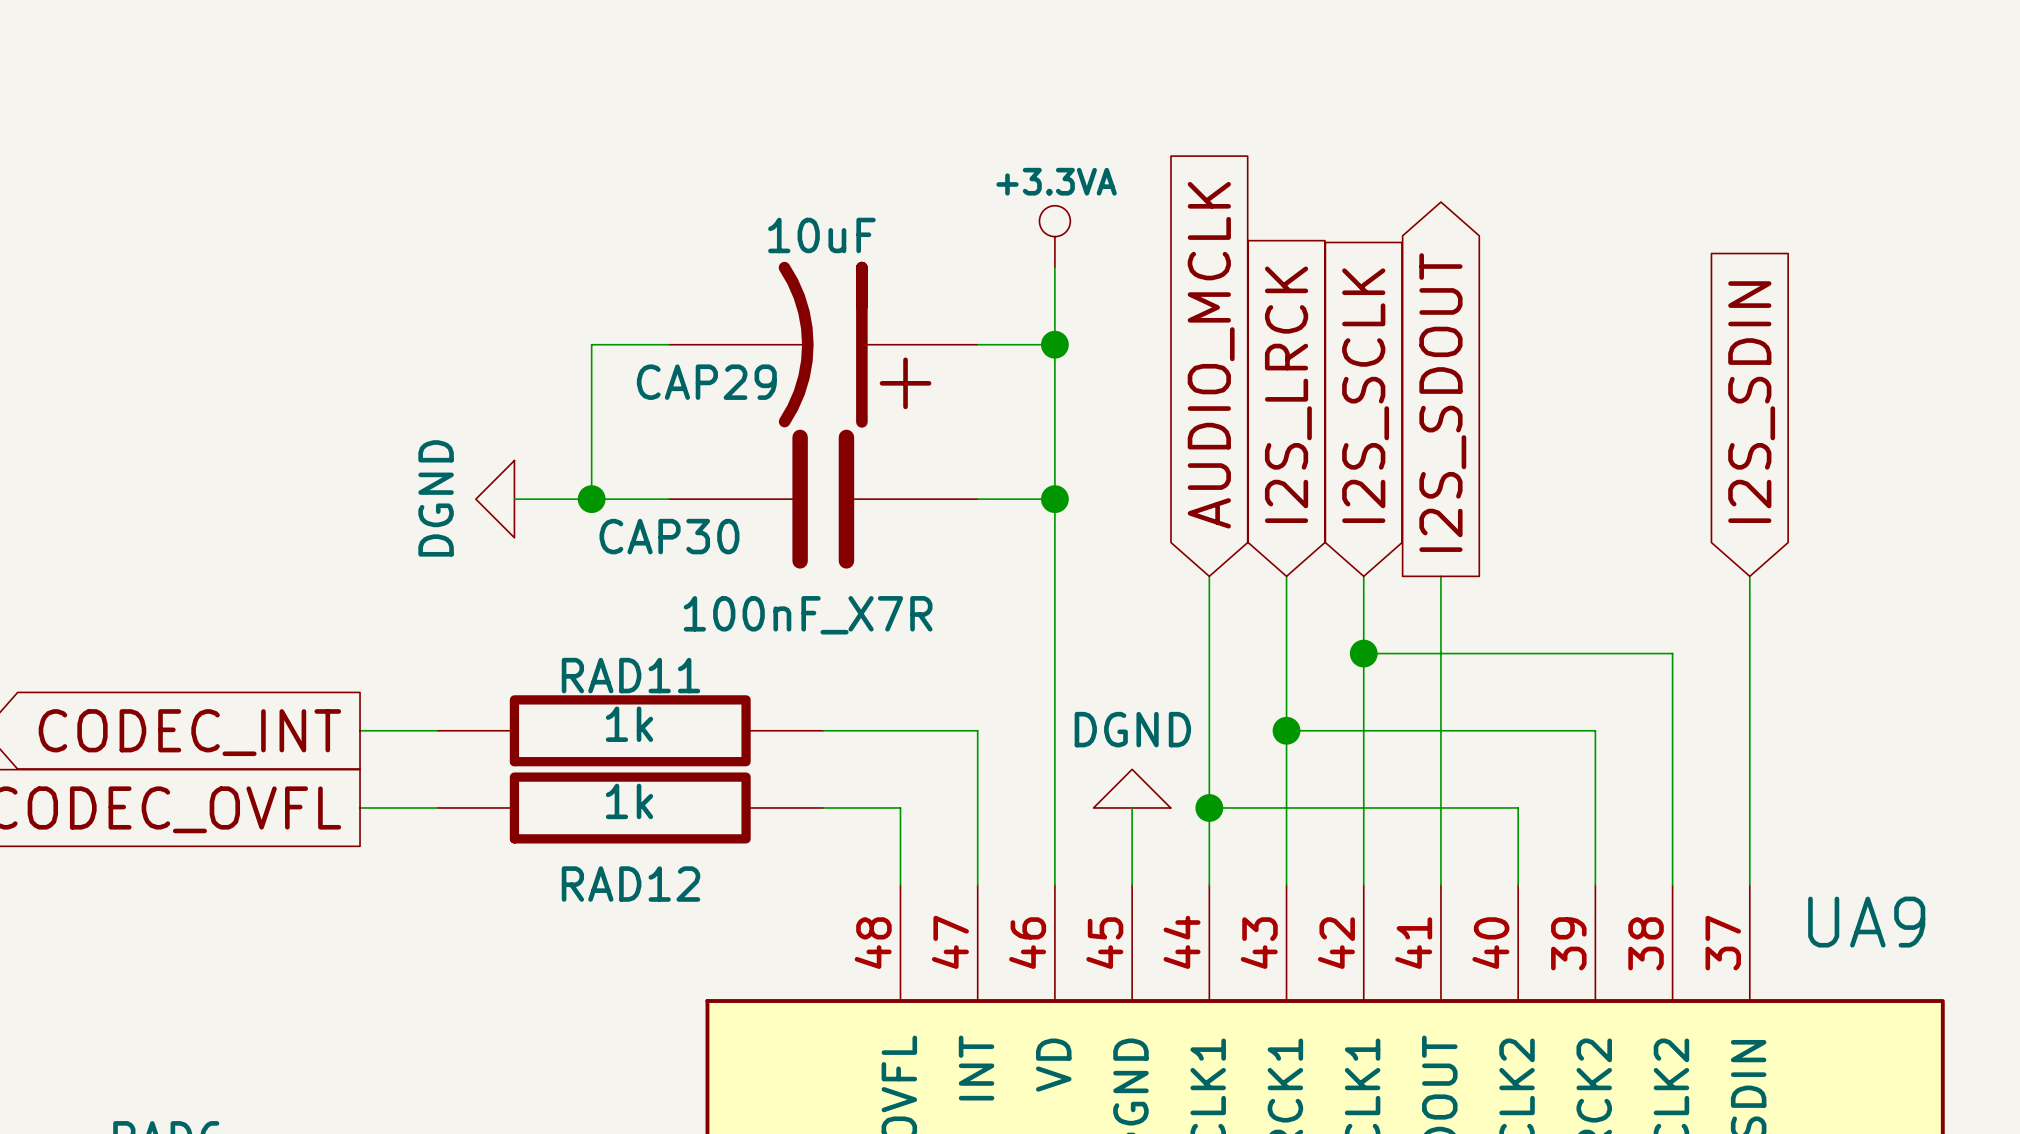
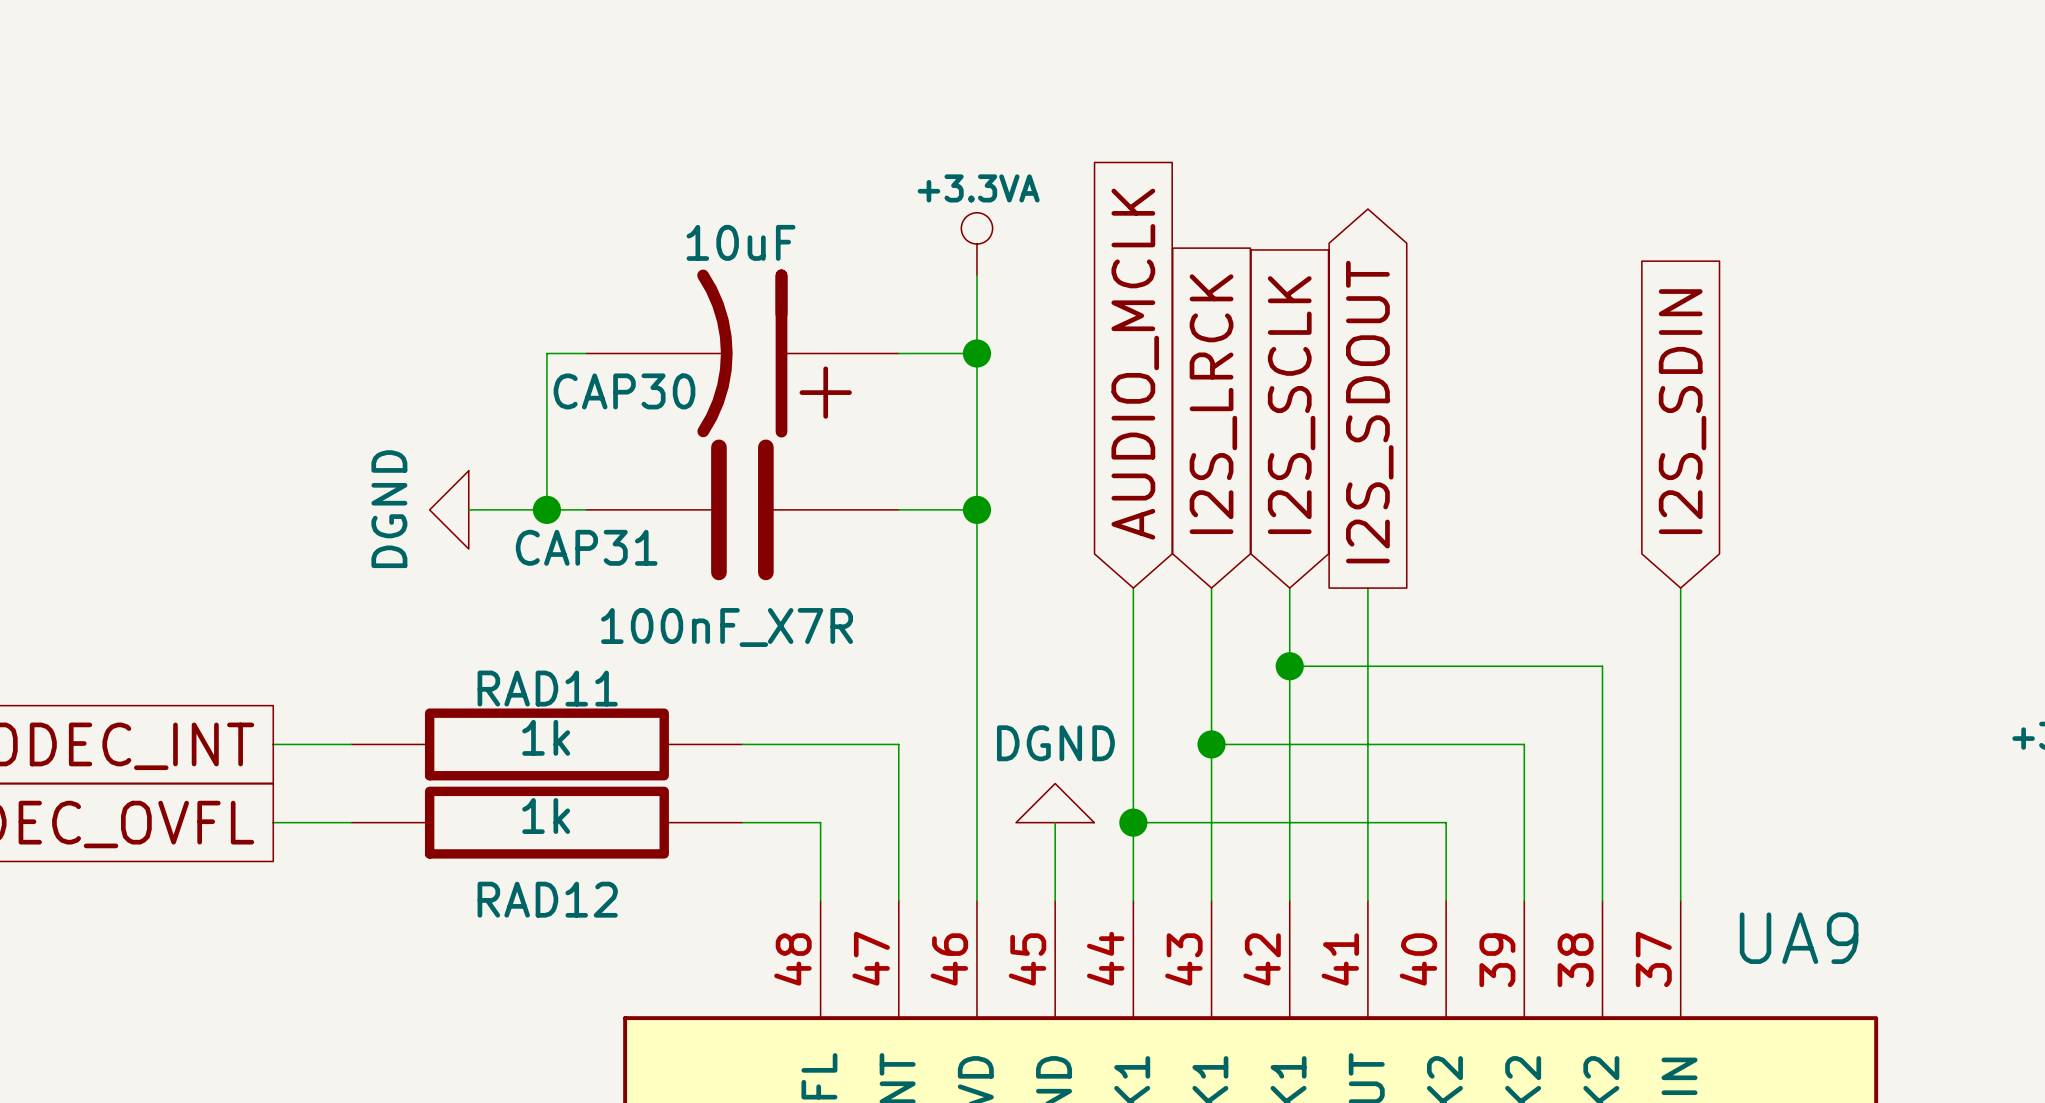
wire: (630, 344) (591, 344) (591, 499) -> (546, 353) (546, 509)
CAP29 name: CAP29 (706, 382) -> CAP30 (624, 391)
power symbol position: DGND (495, 499) -> DGND (449, 509)
wire: (514, 499) (553, 499) -> none
junction position: (591, 499) -> (546, 509)
CAP30 name: CAP30 (669, 536) -> CAP31 (586, 547)

